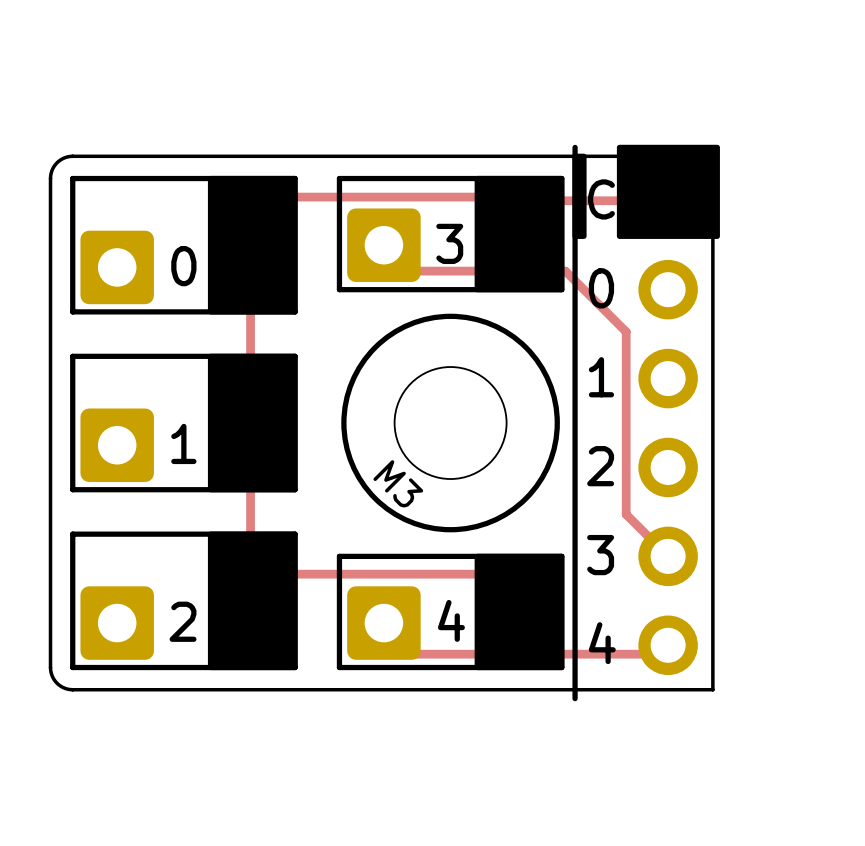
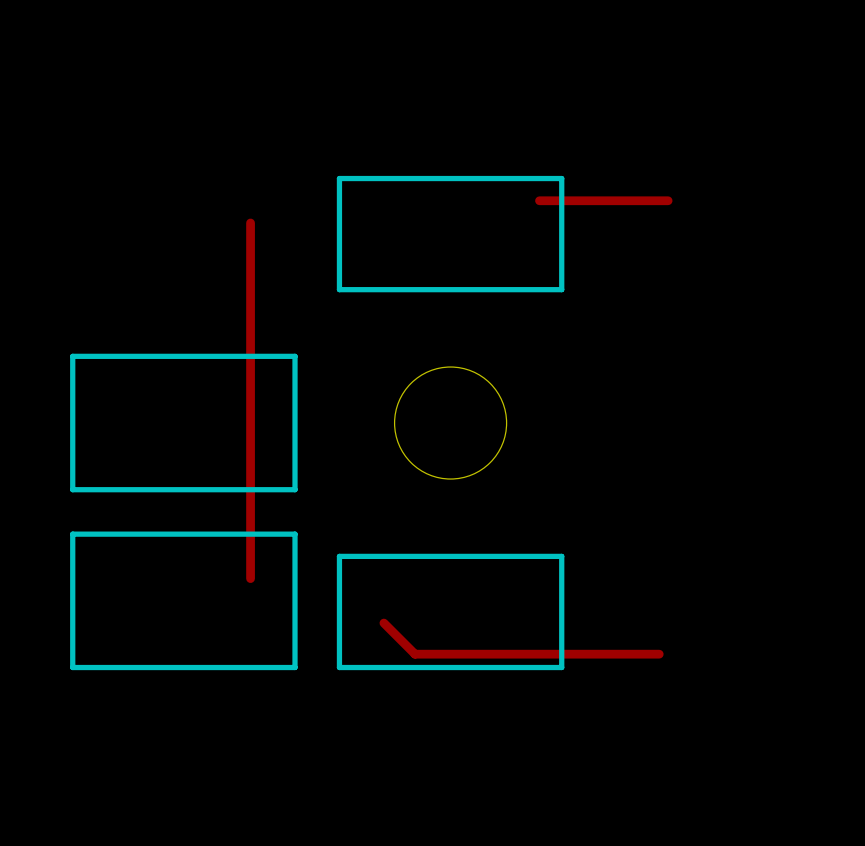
drawing: [341, 144, 720, 671] -> none
line: (575, 147) (575, 698) -> none
board edge: (72, 156) (712, 156) (712, 689) (72, 689) (58, 684) (52, 677) (50, 667) (50, 178) (51, 171) (57, 162) (63, 158) (72, 156) -> none
drawing: [207, 175, 298, 671] -> none
line: (72, 178) (72, 311) (295, 311) (295, 178) (72, 178) -> none
track: (254, 197) (491, 197) -> none
text: 3 (449, 243) -> none
track: (383, 245) (409, 271) (565, 271) (626, 331) (626, 514) (668, 556) -> none
part: (383, 245) -> none
text: 0 (183, 266) -> none
part: (117, 267) -> none
part: (668, 423) -> none
text: 1 (183, 443) -> none
part: (117, 445) -> none
text: M3 (398, 483) -> none
track: (232, 574) (490, 574) -> none
text: 4 (451, 620) -> none
text: 2 (183, 621) -> none
part: (117, 623) -> none
part: (383, 623) -> none

